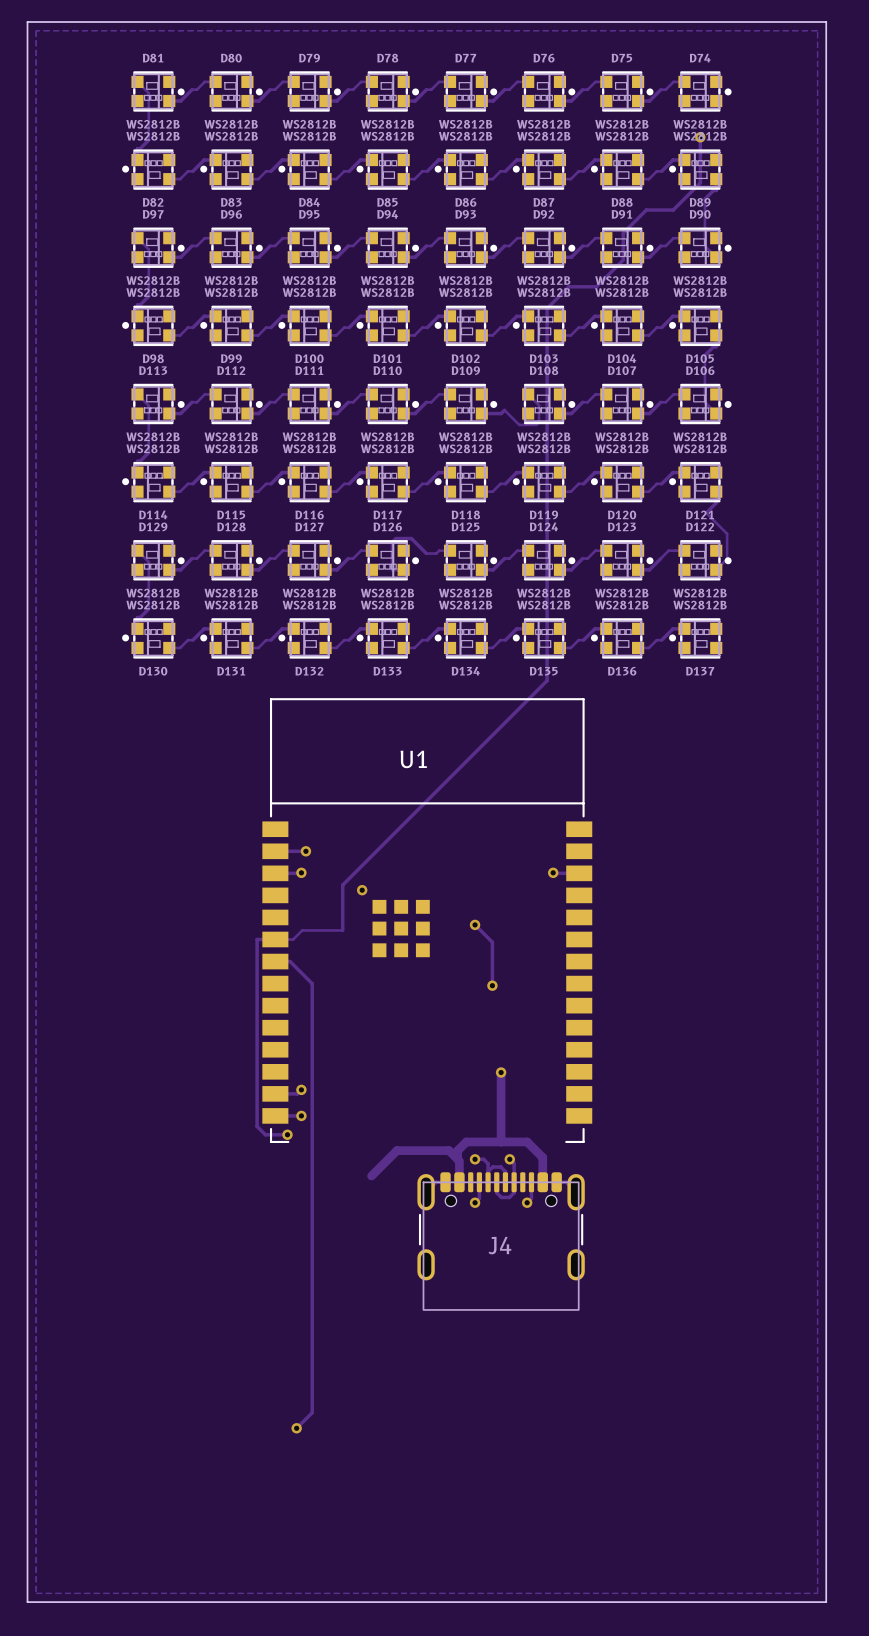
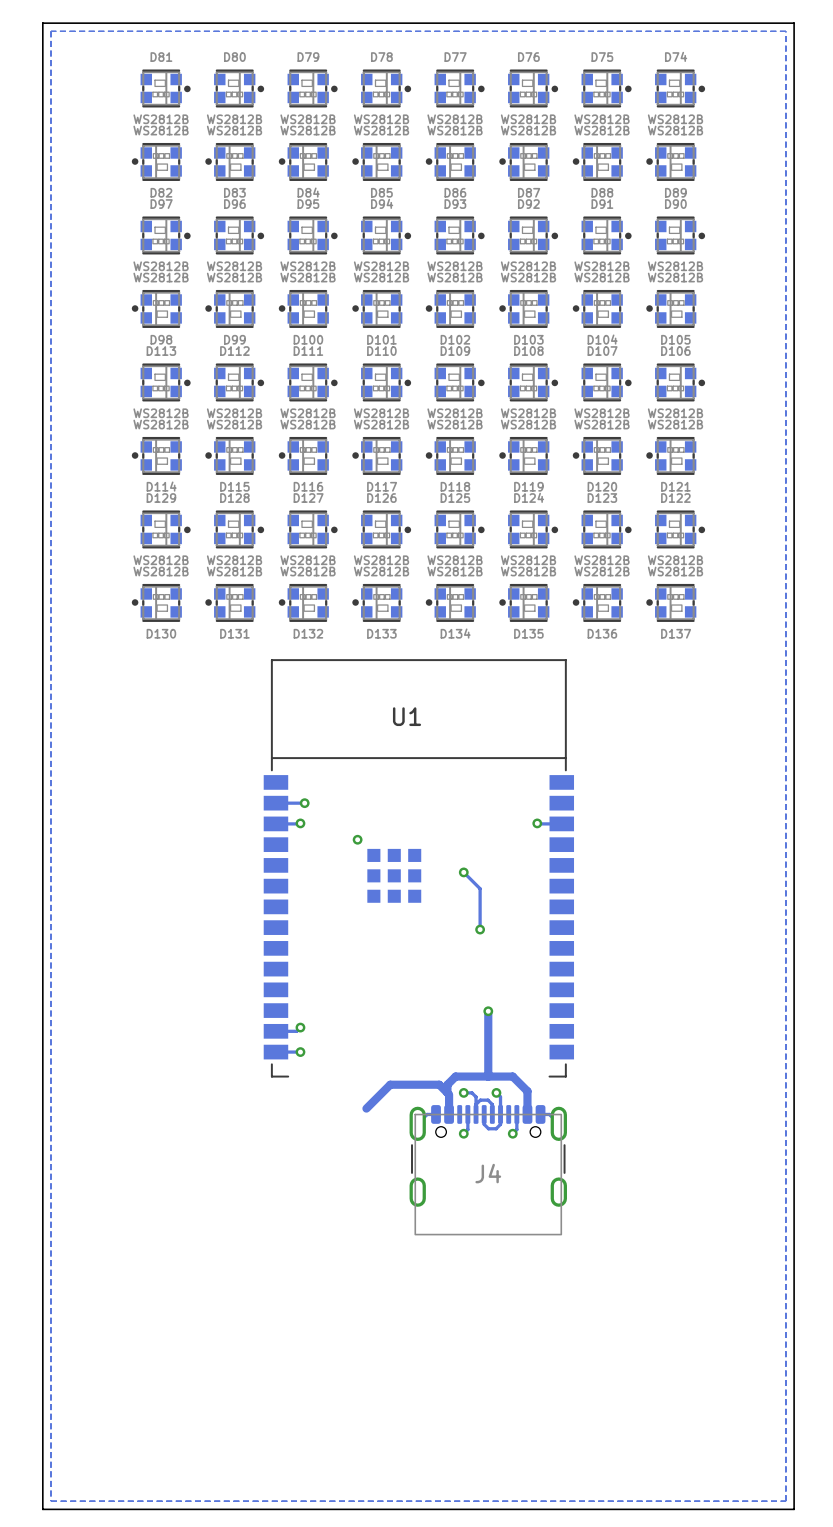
track: (137, 81) (148, 93) (148, 140) (140, 148) (137, 148) (137, 160) -> none
track: (215, 81) (204, 81) (196, 89) (192, 89) (180, 101) (169, 101) -> none
track: (293, 81) (282, 81) (275, 89) (270, 89) (258, 101) (247, 101) -> none
track: (371, 81) (361, 81) (353, 89) (348, 89) (337, 101) (325, 101) -> none
track: (450, 81) (439, 81) (431, 89) (426, 89) (415, 101) (403, 101) -> none
track: (528, 81) (517, 81) (509, 89) (504, 89) (493, 101) (481, 101) -> none
track: (606, 81) (595, 81) (587, 89) (582, 89) (571, 101) (559, 101) -> none
track: (684, 81) (673, 81) (665, 89) (660, 89) (649, 101) (638, 101) -> none
track: (700, 137) (700, 182) (673, 210) (646, 210) (623, 233) (623, 259) (596, 286) (568, 286) (547, 308) (547, 680) (342, 885) (342, 930) (302, 930) (293, 939) (257, 939) (257, 1126) (265, 1134) (287, 1134) -> none
via: (700, 137) -> none
track: (215, 160) (204, 160) (192, 171) (187, 171) (180, 179) (169, 179) -> none
track: (293, 160) (282, 160) (271, 171) (266, 171) (258, 179) (247, 179) -> none
track: (371, 160) (360, 160) (349, 171) (344, 171) (336, 179) (325, 179) -> none
track: (450, 160) (438, 160) (427, 171) (422, 171) (414, 179) (403, 179) -> none
track: (528, 160) (516, 160) (505, 171) (500, 171) (492, 179) (481, 179) -> none
track: (606, 160) (594, 160) (583, 171) (578, 171) (570, 179) (559, 179) -> none
track: (684, 160) (673, 160) (661, 171) (656, 171) (648, 179) (638, 179) -> none
track: (716, 179) (716, 190) (713, 190) (704, 199) (704, 245) (716, 257) -> none
track: (137, 238) (148, 249) (148, 296) (140, 305) (137, 305) (137, 316) -> none
track: (215, 238) (204, 238) (196, 245) (192, 245) (180, 257) (169, 257) -> none
track: (293, 238) (282, 238) (275, 245) (270, 245) (258, 257) (247, 257) -> none
track: (371, 238) (361, 238) (353, 245) (348, 245) (337, 257) (325, 257) -> none
track: (450, 238) (439, 238) (431, 245) (426, 245) (415, 257) (403, 257) -> none
track: (528, 238) (517, 238) (509, 245) (504, 245) (493, 257) (481, 257) -> none
track: (606, 238) (595, 238) (587, 245) (582, 245) (571, 257) (559, 257) -> none
track: (684, 238) (673, 238) (665, 245) (660, 245) (649, 257) (638, 257) -> none
track: (215, 316) (204, 316) (192, 327) (187, 327) (180, 335) (169, 335) -> none
track: (293, 316) (282, 316) (271, 327) (266, 327) (258, 335) (247, 335) -> none
track: (371, 316) (360, 316) (349, 327) (344, 327) (336, 335) (325, 335) -> none
track: (450, 316) (438, 316) (427, 327) (422, 327) (414, 335) (403, 335) -> none
track: (528, 316) (516, 316) (505, 327) (500, 327) (492, 335) (481, 335) -> none
track: (606, 316) (594, 316) (583, 327) (578, 327) (570, 335) (559, 335) -> none
track: (684, 316) (673, 316) (661, 327) (656, 327) (648, 335) (638, 335) -> none
track: (716, 335) (716, 346) (713, 346) (704, 355) (704, 402) (716, 413) -> none
track: (137, 394) (148, 405) (148, 452) (140, 461) (137, 461) (137, 472) -> none
track: (215, 394) (204, 394) (196, 402) (192, 402) (180, 413) (169, 413) -> none
track: (293, 394) (282, 394) (275, 402) (270, 402) (258, 413) (247, 413) -> none
track: (371, 394) (361, 394) (353, 402) (348, 402) (337, 413) (325, 413) -> none
track: (450, 394) (439, 394) (431, 402) (426, 402) (415, 413) (403, 413) -> none
track: (528, 394) (539, 405) (539, 422) (536, 424) (519, 424) (504, 410) (501, 413) (481, 413) -> none
track: (606, 394) (595, 394) (587, 402) (582, 402) (571, 413) (559, 413) -> none
track: (684, 394) (673, 394) (665, 402) (660, 402) (649, 413) (638, 413) -> none
track: (215, 472) (204, 472) (192, 483) (187, 483) (180, 491) (169, 491) -> none
track: (293, 472) (282, 472) (271, 483) (266, 483) (258, 491) (247, 491) -> none
track: (371, 472) (360, 472) (349, 483) (344, 483) (336, 491) (325, 491) -> none
track: (450, 472) (438, 472) (427, 483) (422, 483) (414, 491) (403, 491) -> none
track: (528, 472) (516, 472) (505, 483) (500, 483) (492, 491) (481, 491) -> none
track: (606, 472) (594, 472) (583, 483) (578, 483) (570, 491) (559, 491) -> none
track: (684, 472) (673, 472) (661, 483) (656, 483) (648, 491) (638, 491) -> none
track: (716, 491) (716, 503) (706, 512) (727, 533) (727, 558) (716, 569) -> none
track: (137, 550) (148, 562) (148, 608) (140, 617) (137, 617) (137, 628) -> none
track: (215, 550) (204, 550) (196, 558) (192, 558) (180, 569) (169, 569) -> none
track: (293, 550) (282, 550) (275, 558) (270, 558) (258, 569) (247, 569) -> none
track: (371, 550) (361, 550) (353, 558) (348, 558) (337, 569) (325, 569) -> none
track: (450, 550) (426, 553) (411, 538) (395, 538) (392, 542) (392, 569) (403, 569) -> none
track: (528, 550) (517, 550) (509, 558) (504, 558) (493, 569) (481, 569) -> none
track: (606, 550) (595, 550) (587, 558) (582, 558) (571, 569) (559, 569) -> none
track: (684, 550) (668, 550) (649, 569) (638, 569) -> none
track: (215, 628) (204, 628) (192, 640) (187, 640) (180, 647) (169, 647) -> none
track: (293, 628) (282, 628) (271, 640) (266, 640) (258, 647) (247, 647) -> none
track: (371, 628) (360, 628) (349, 640) (344, 640) (336, 647) (325, 647) -> none
track: (450, 628) (438, 628) (427, 640) (422, 640) (414, 647) (403, 647) -> none
track: (528, 628) (516, 628) (505, 640) (500, 640) (492, 647) (481, 647) -> none
track: (606, 628) (594, 628) (583, 640) (578, 640) (570, 647) (559, 647) -> none
track: (684, 628) (673, 628) (661, 640) (656, 640) (648, 647) (638, 647) -> none
track: (275, 961) (290, 961) (312, 983) (312, 1412) (296, 1428) -> none
via: (287, 1134) -> none
via: (296, 1428) -> none

